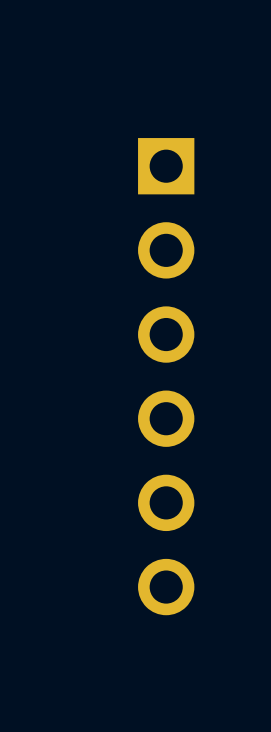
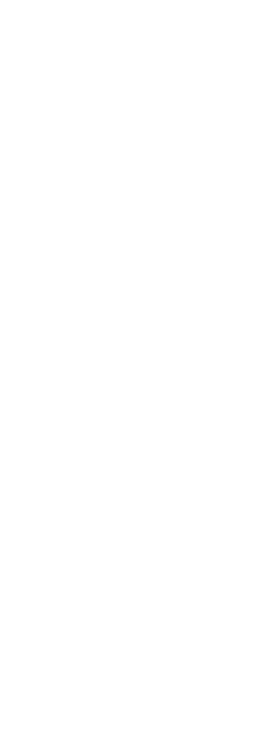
part: (166, 376) -> none

